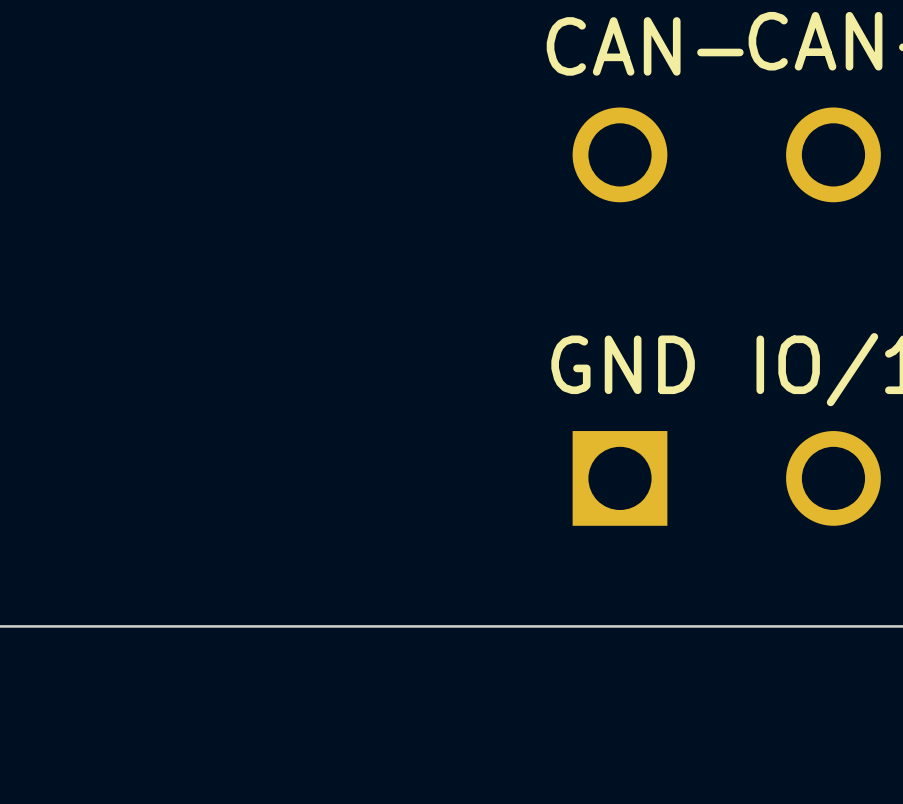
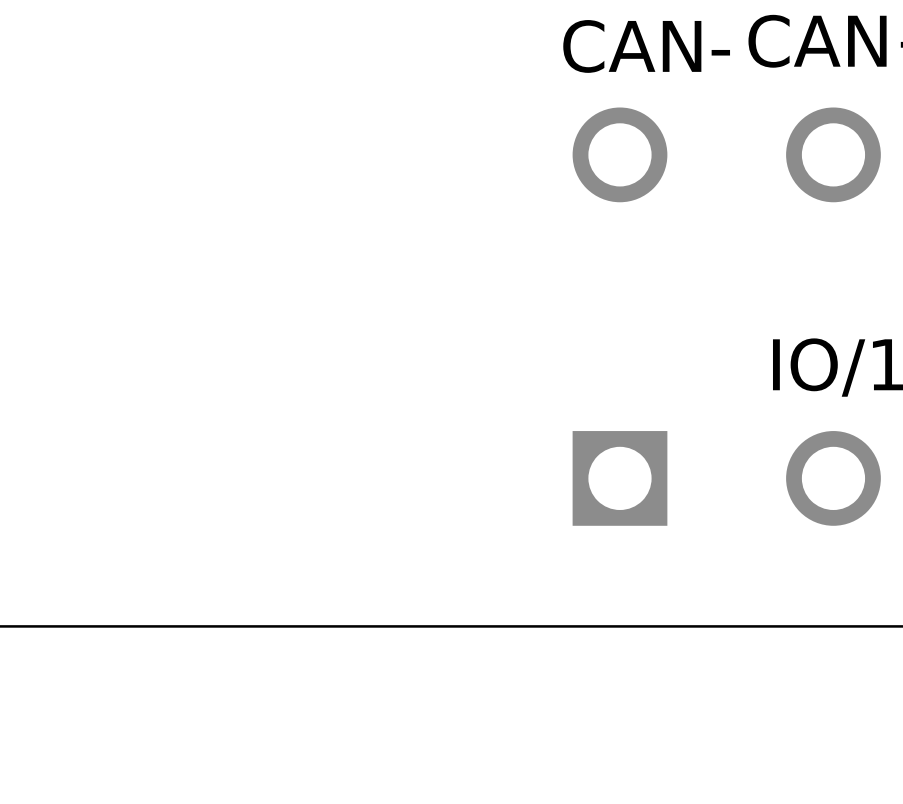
text: GND (623, 364) -> none

